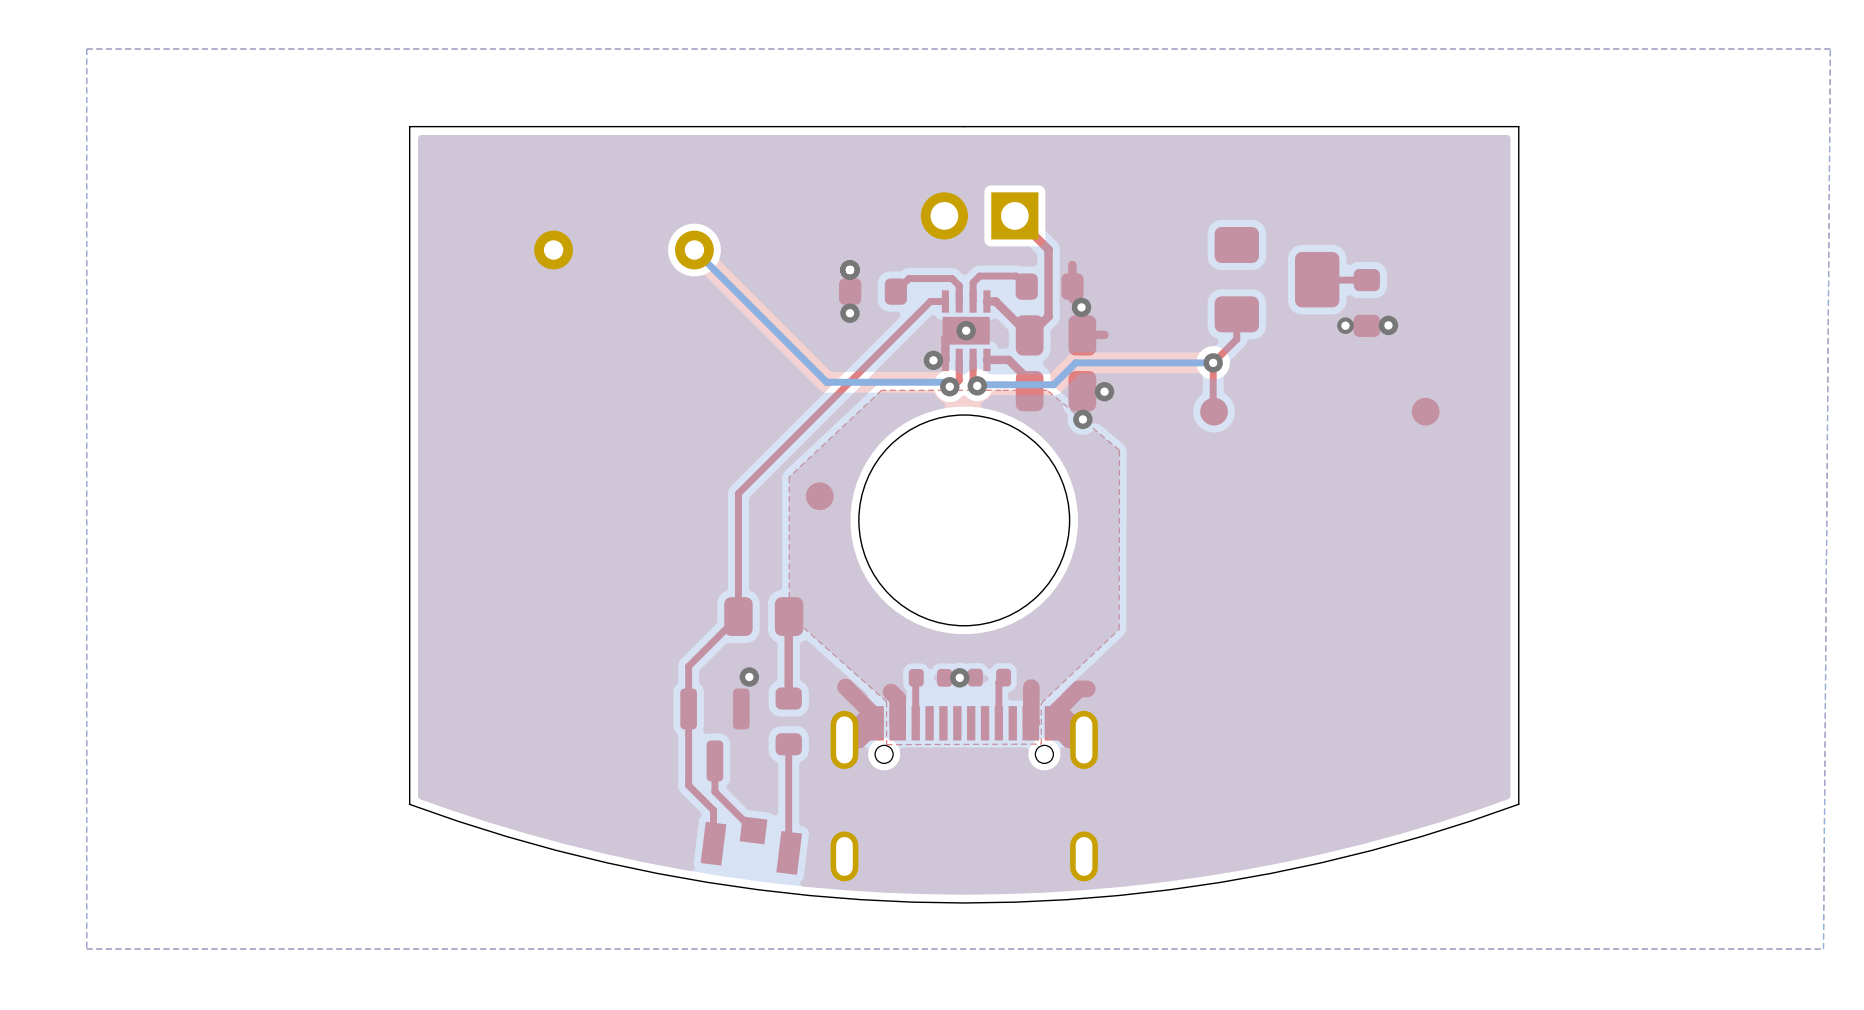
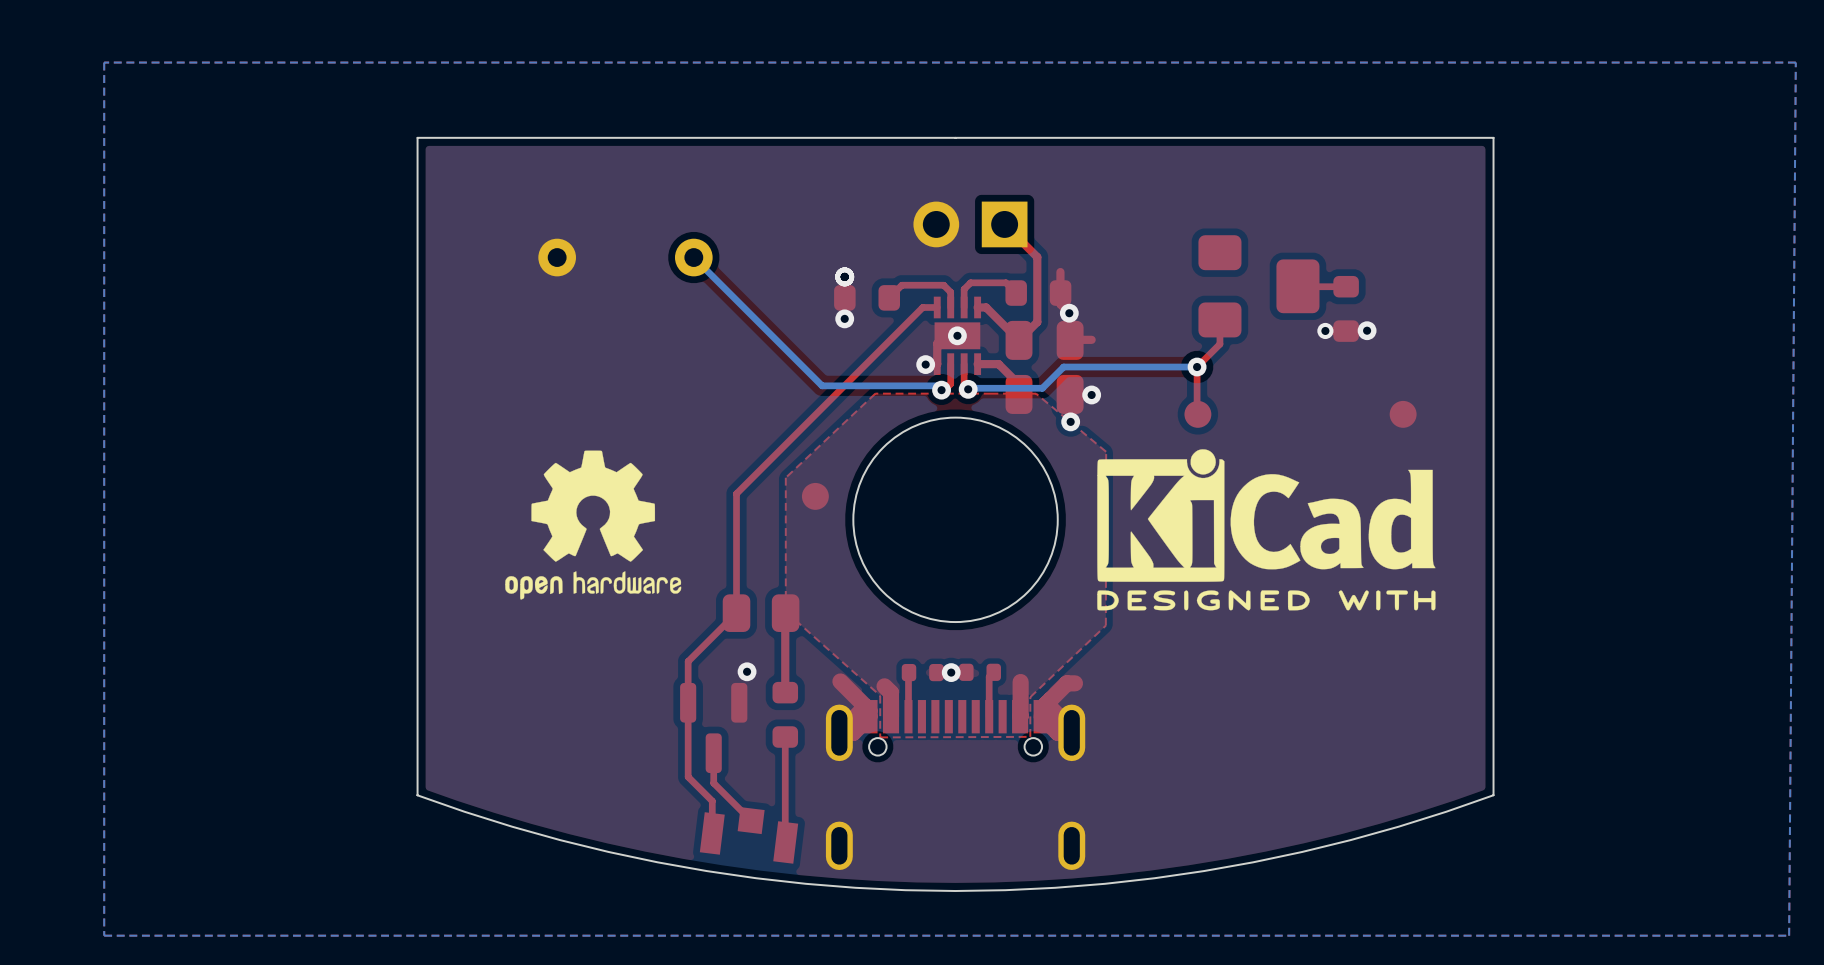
drawing: none -> [1097, 449, 1436, 611]
drawing: none -> [505, 450, 682, 600]

